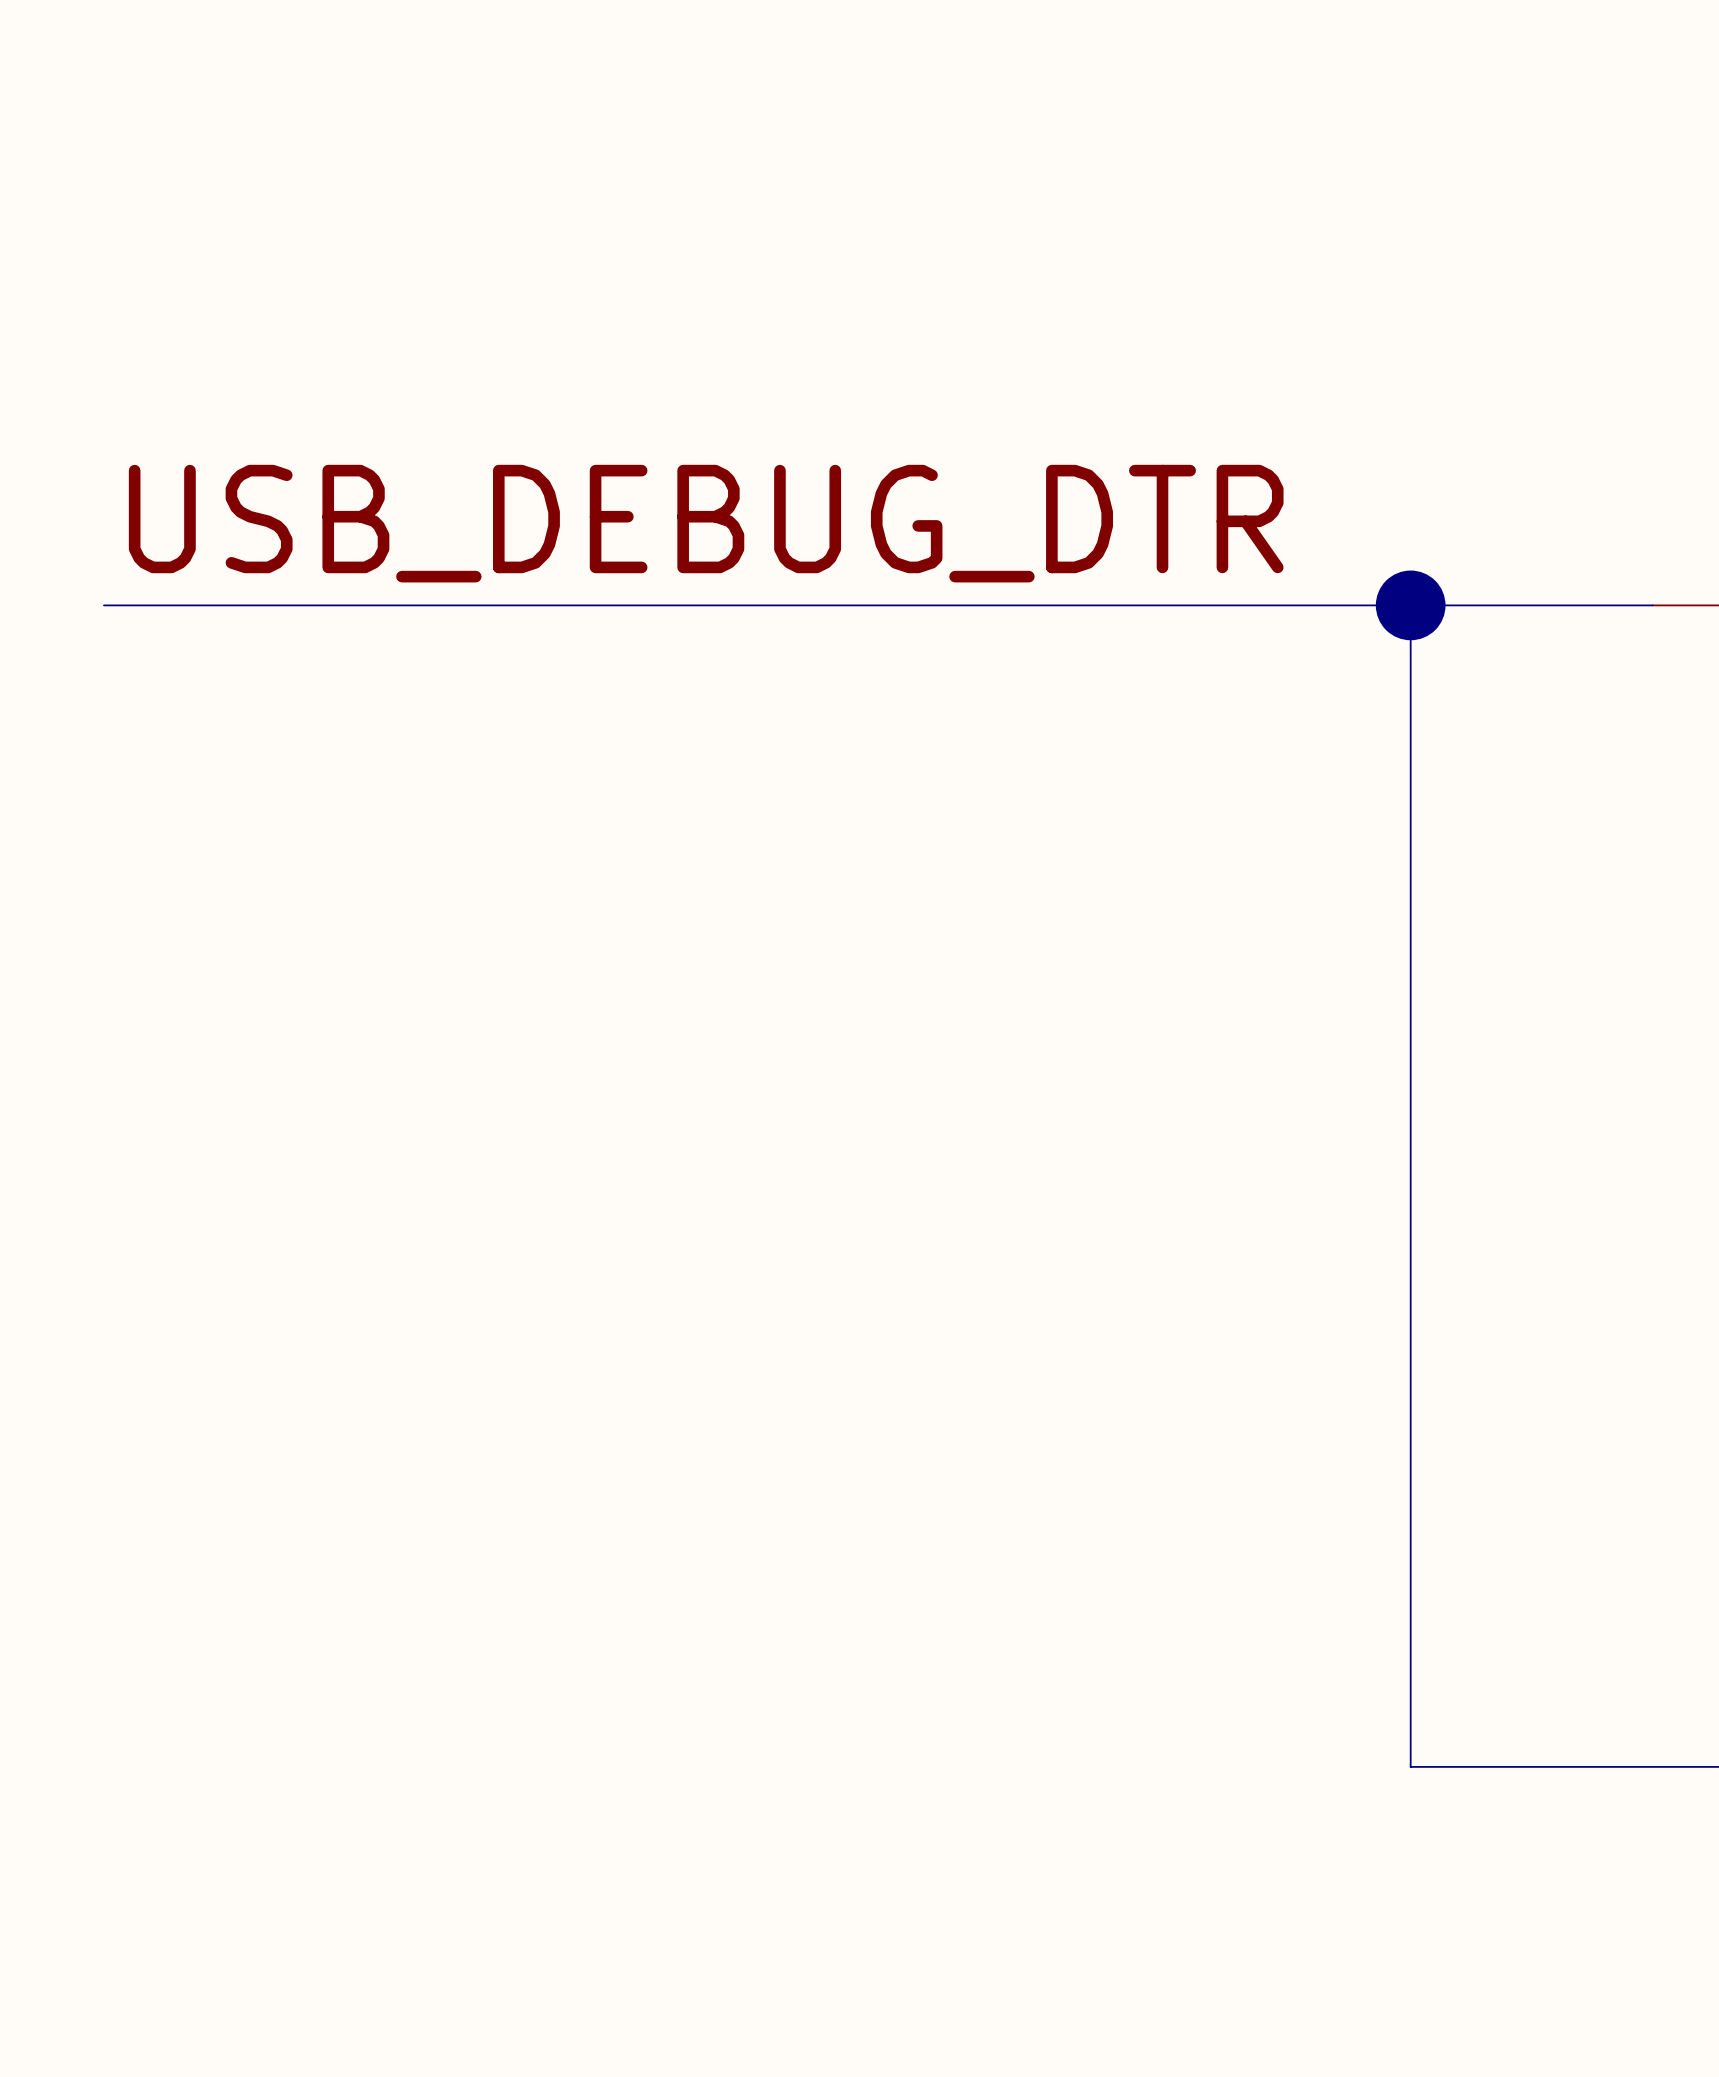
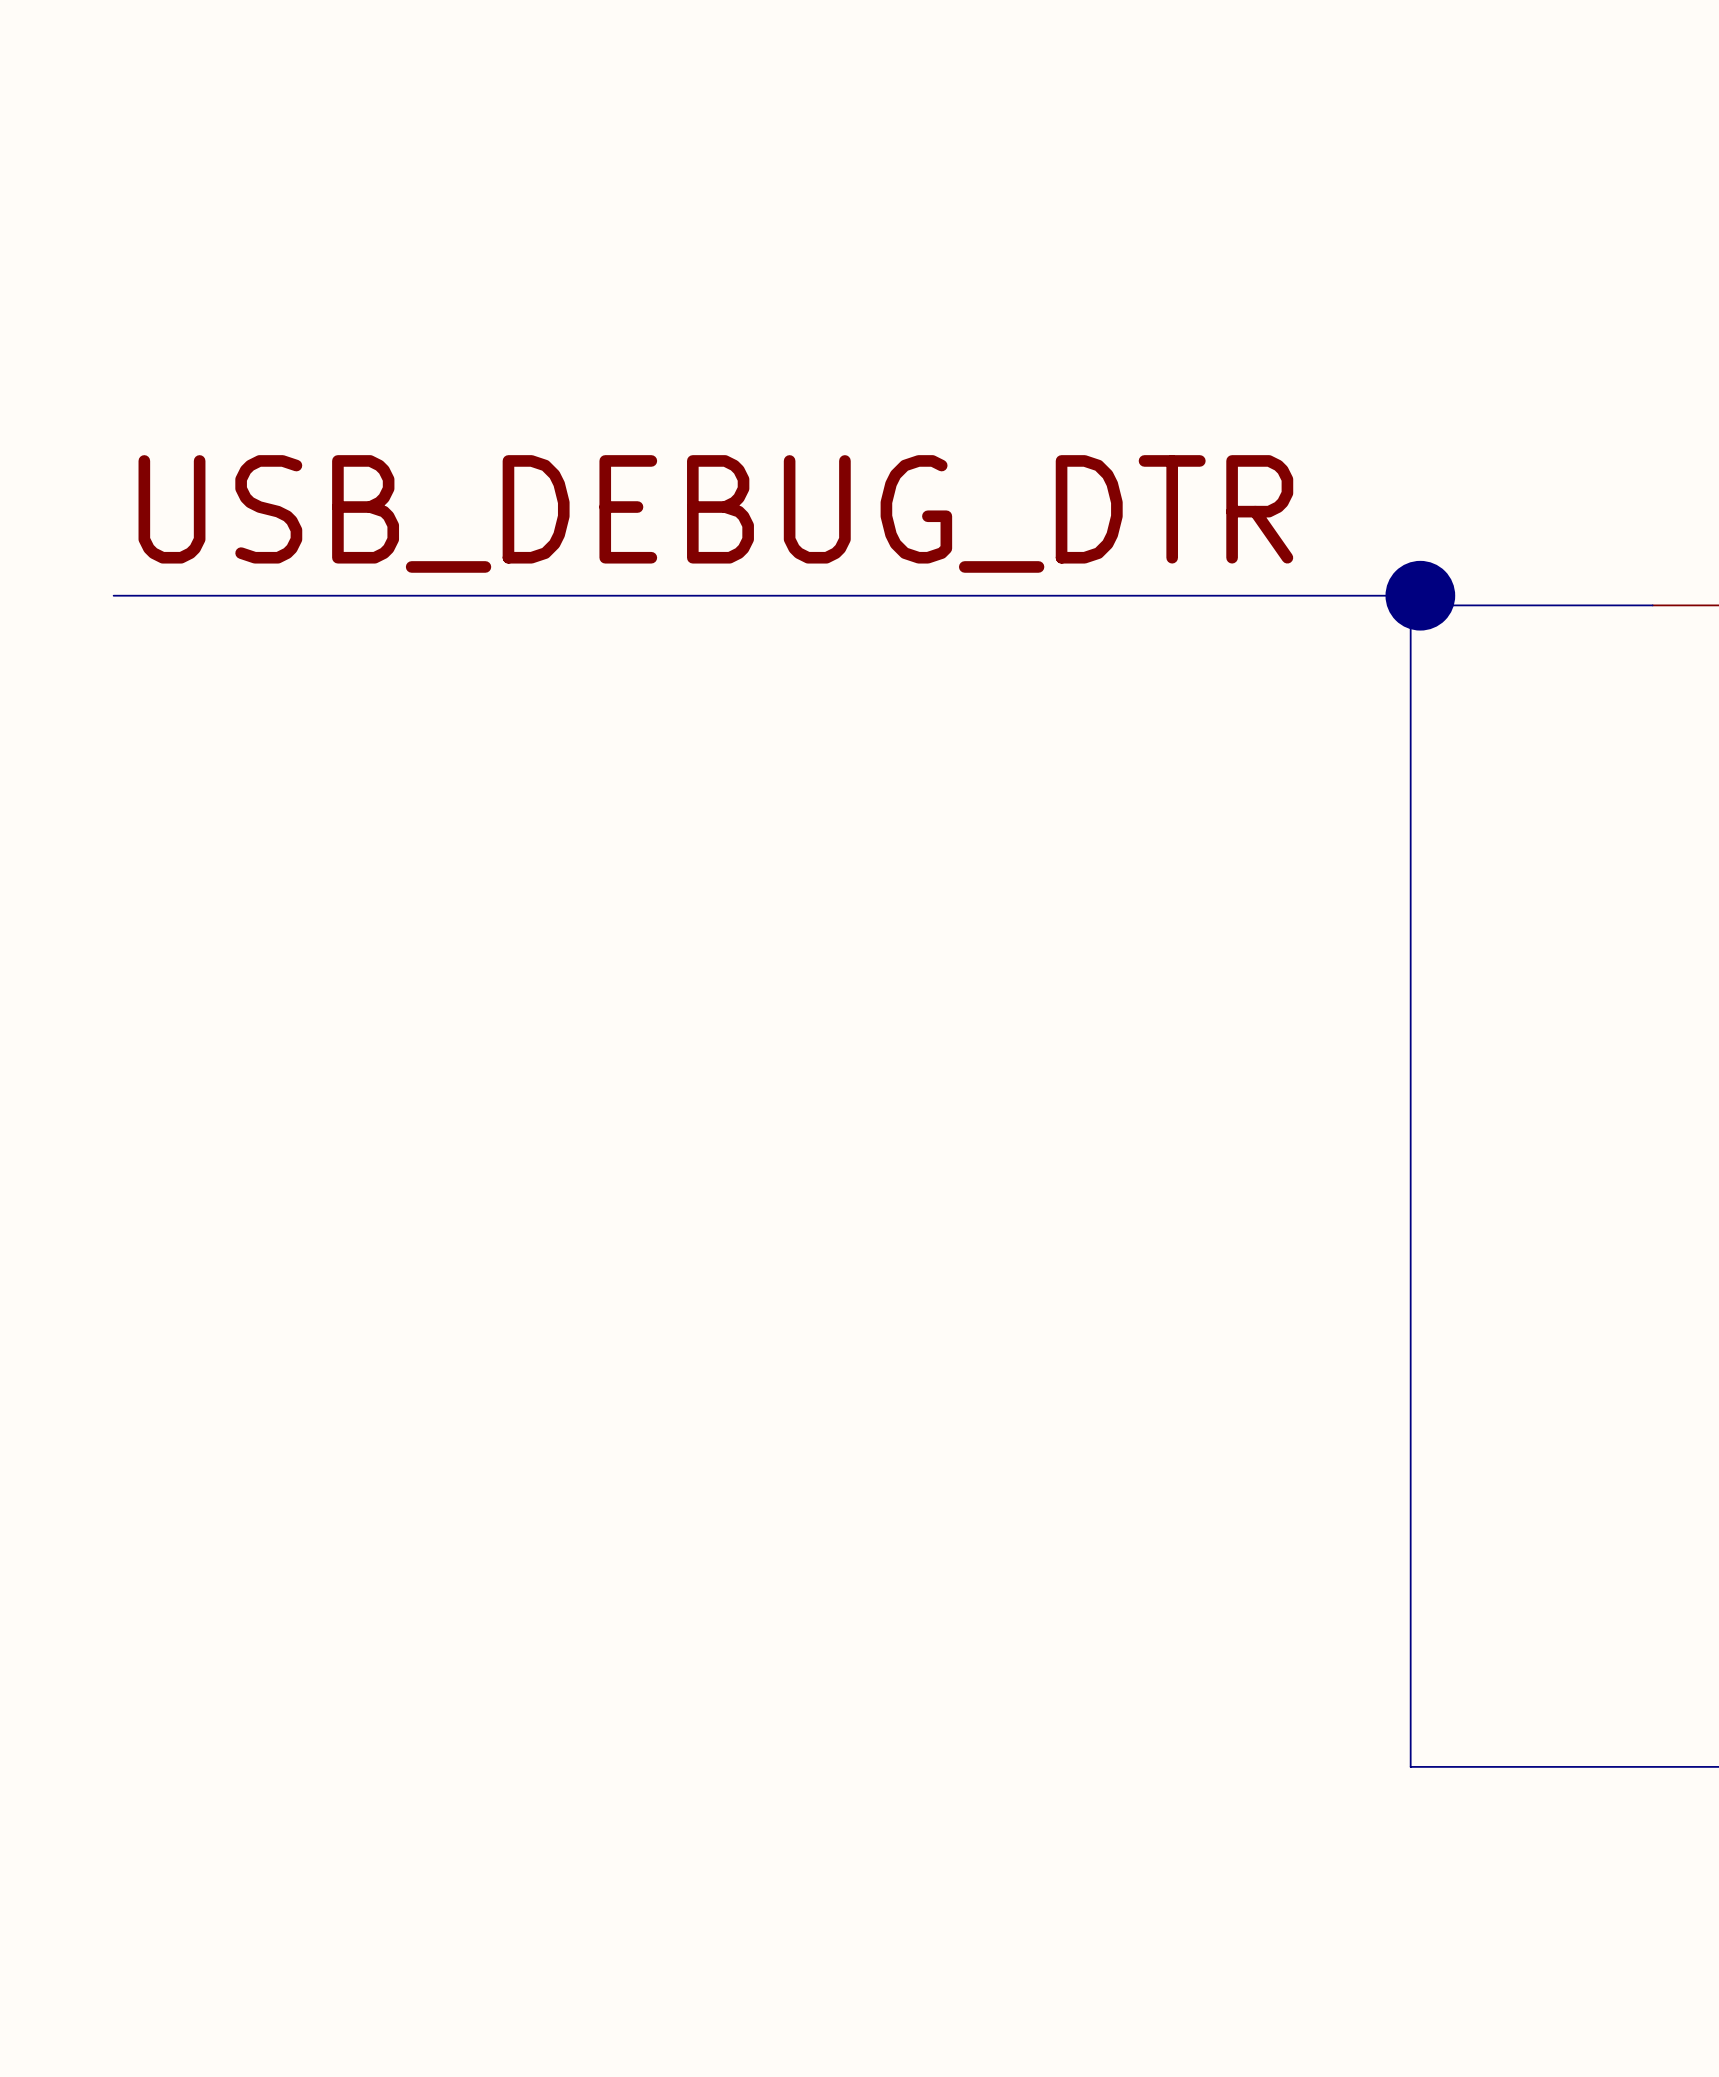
label position: USB_DEBUG_DTR (706, 523) -> USB_DEBUG_DTR (715, 513)
wire: (103, 605) (1410, 605) -> (113, 595) (1420, 595)
junction position: (1410, 605) -> (1420, 595)

